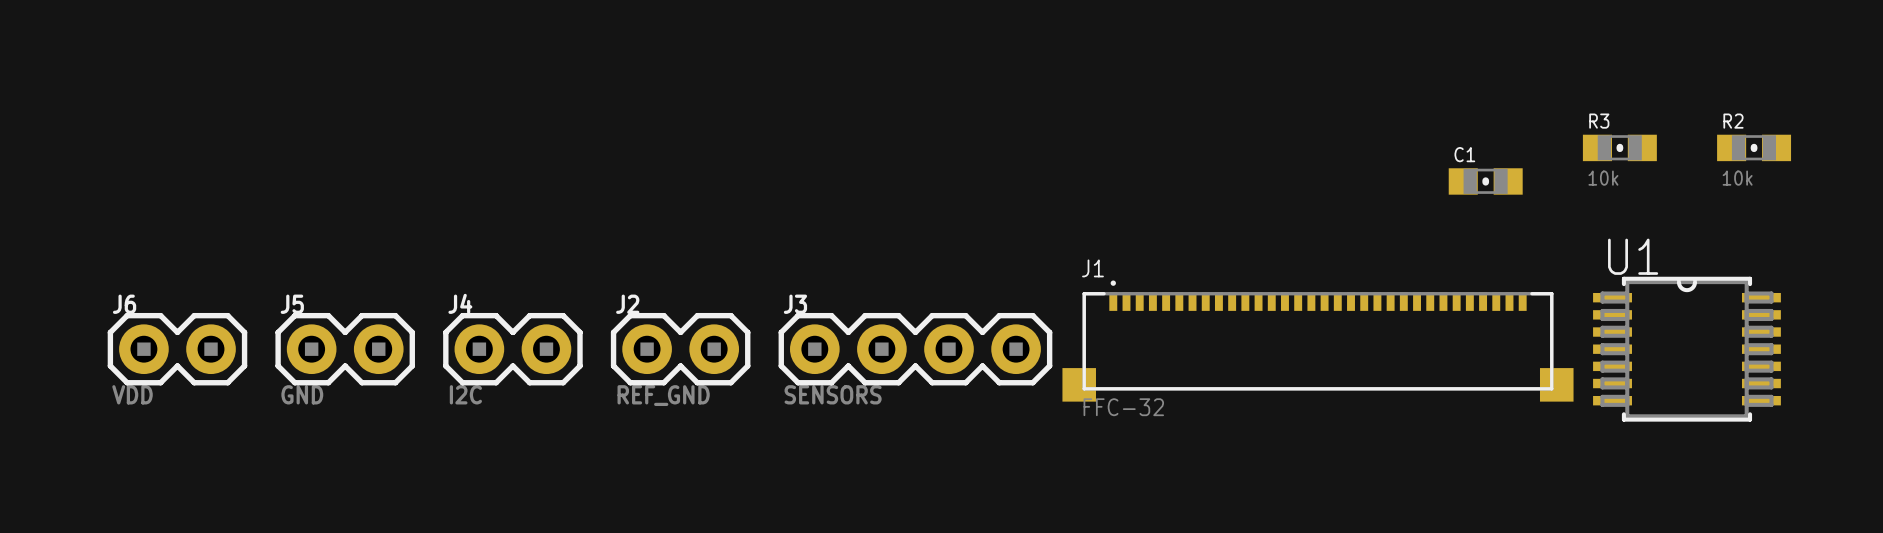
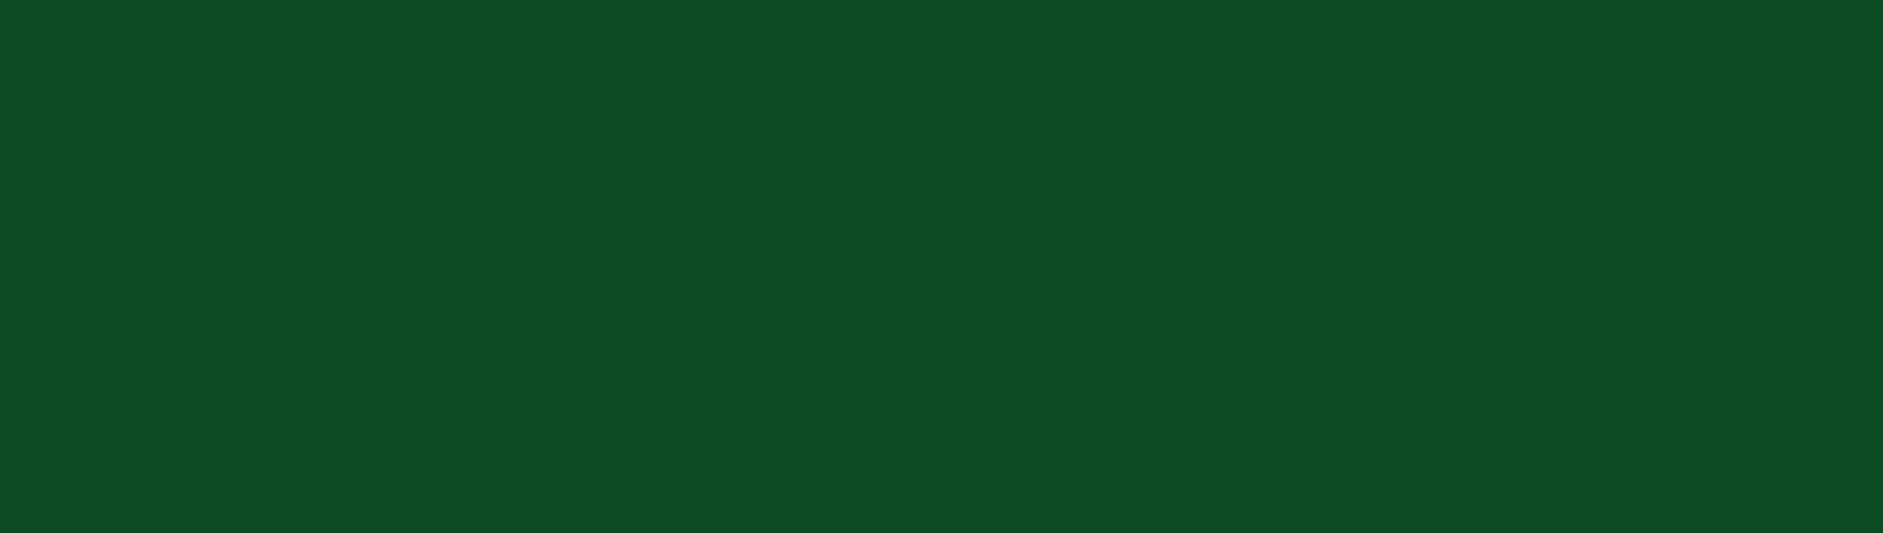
R3: 10k (1619, 147) -> none
R2: 10k (1754, 147) -> none
C1: (1485, 181) -> none
J1: FFC-32 (1317, 341) -> none
J6: VDD (177, 349) -> none
J5: GND (345, 349) -> none
J4: I2C (512, 349) -> none
J2: REF_GND (680, 349) -> none
J3: SENSORS (915, 349) -> none
U1: (1686, 349) -> none

